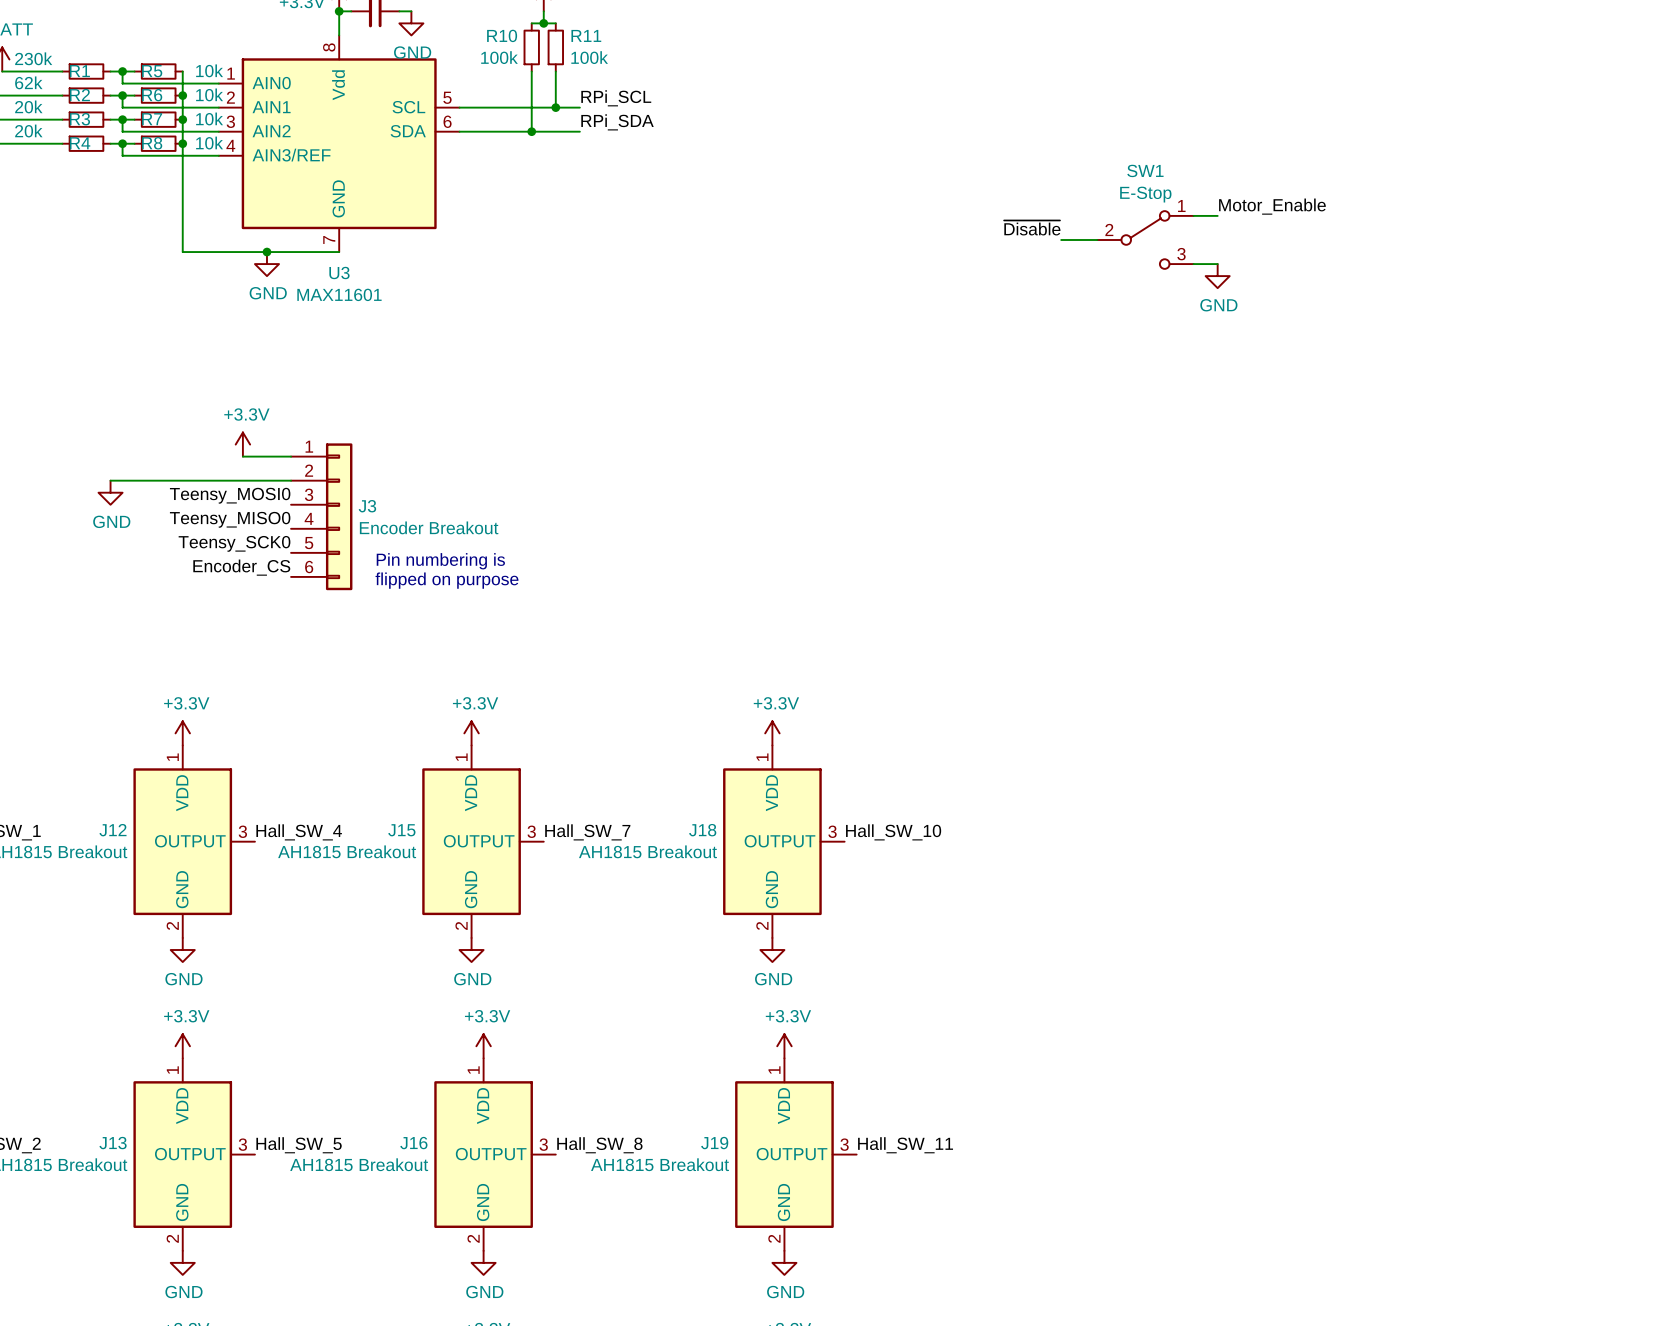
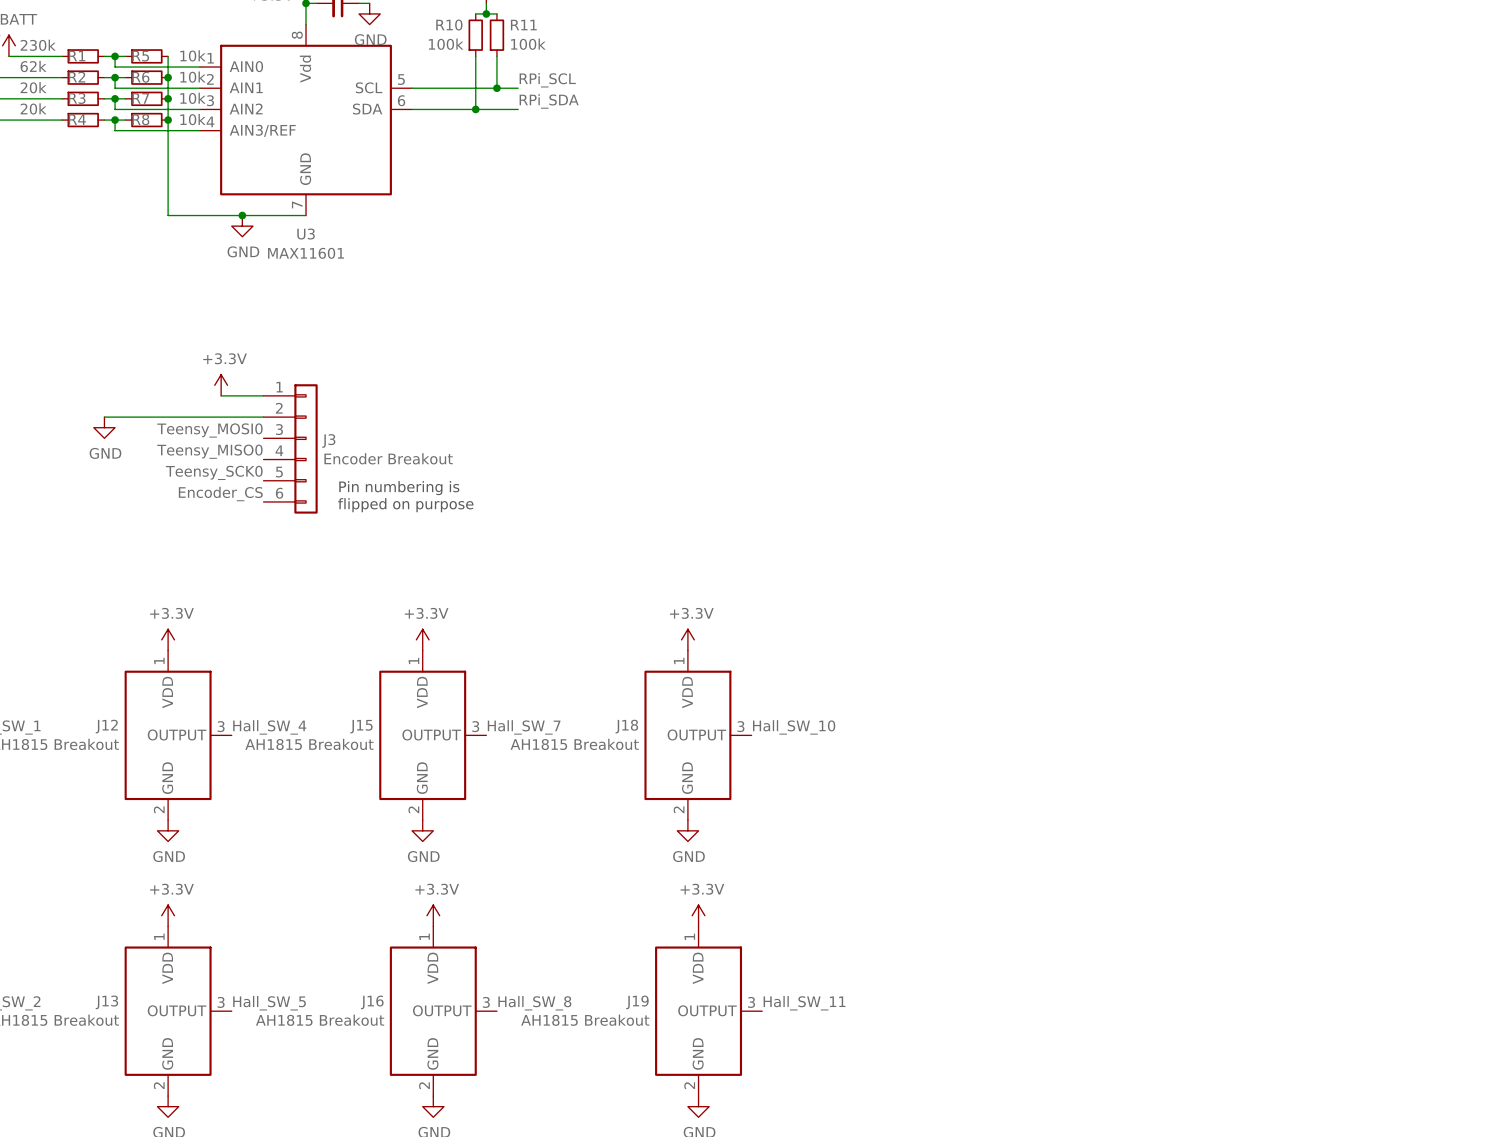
label: Motor_Enable (1272, 206) -> none
wire: (1193, 215) (1217, 215) -> none
label: ~{Disable} (1032, 227) -> none
wire: (1061, 239) (1097, 239) -> none
SW1: E-Stop (1145, 239) -> none
wire: (1193, 264) (1217, 264) -> none
power symbol: GND (1217, 276) -> none

